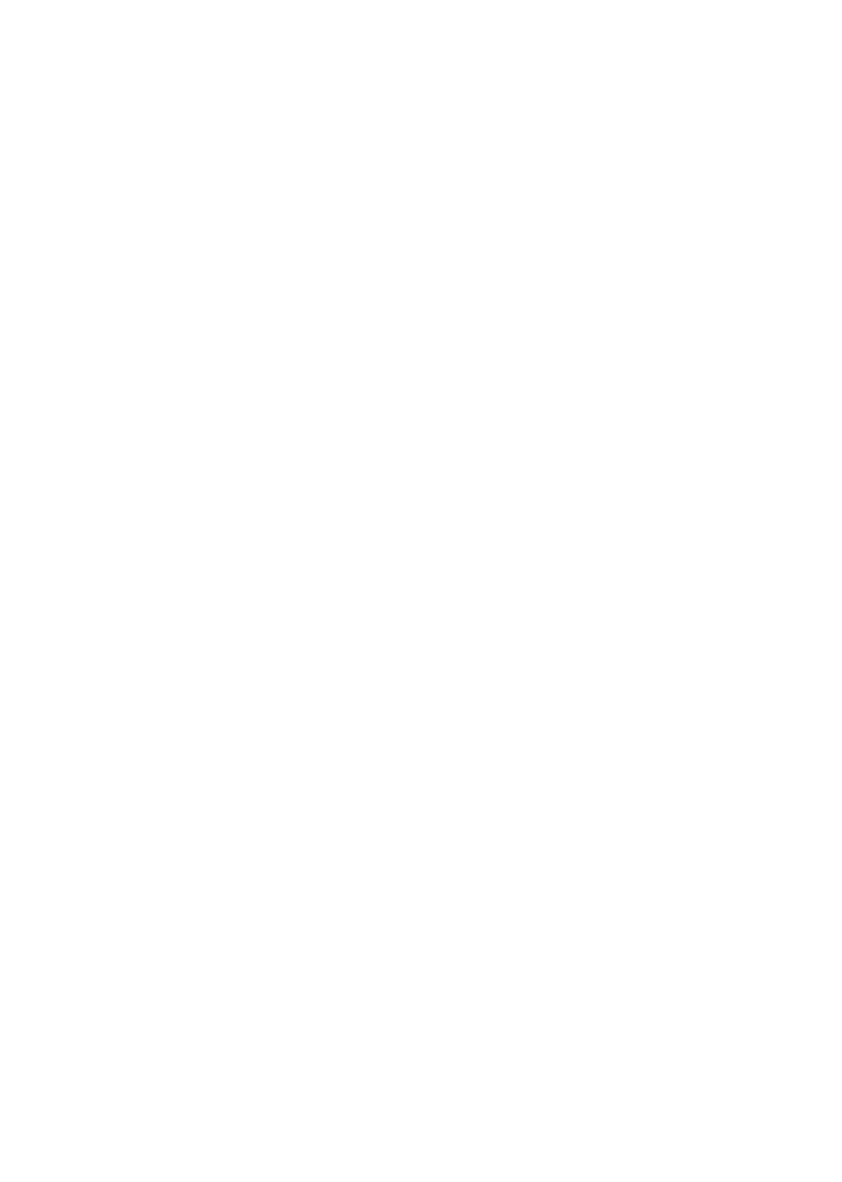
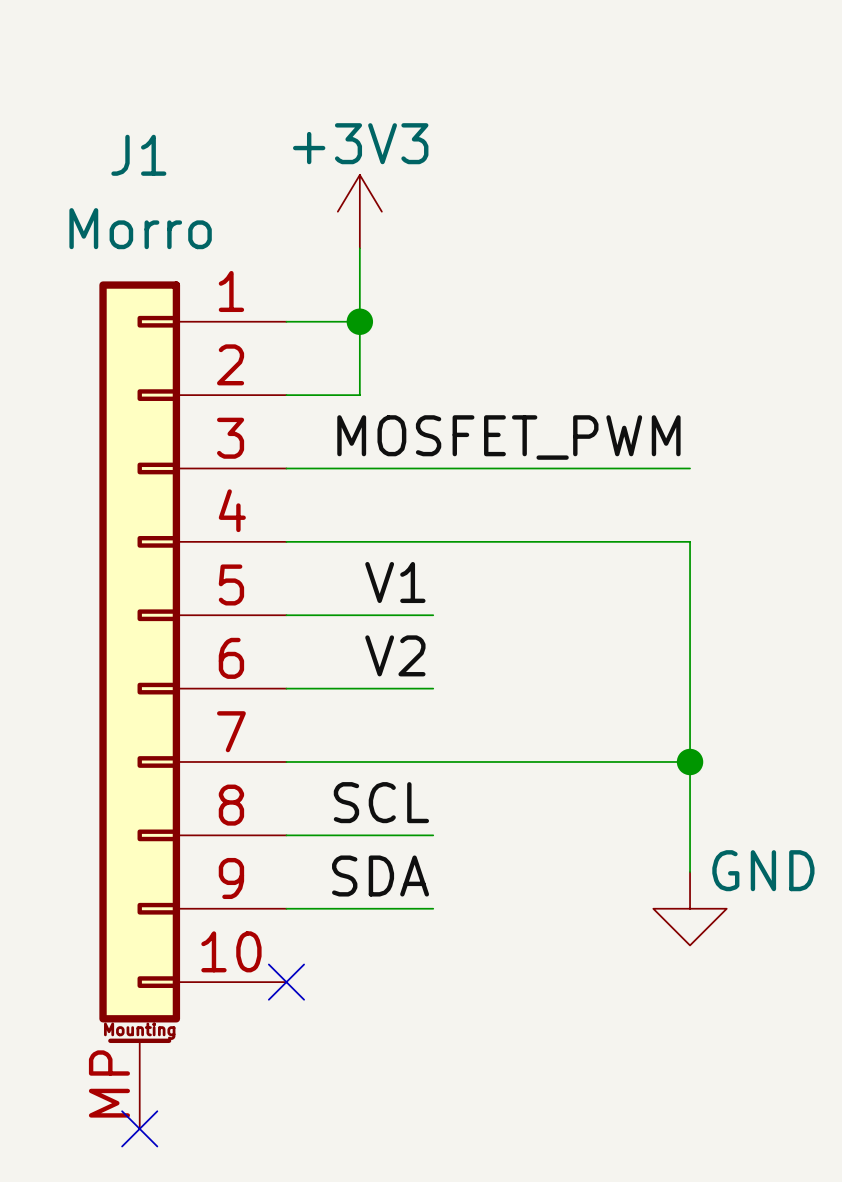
power symbol: none -> +3V3 (359, 211)
wire: none -> (359, 248) (359, 395) (286, 395)
wire: none -> (286, 321) (359, 321)
junction: none -> (359, 321)
label: none -> MOSFET_PWM (508, 437)
wire: none -> (286, 468) (690, 468)
wire: none -> (286, 541) (690, 541) (690, 872)
label: none -> V1 (395, 582)
wire: none -> (286, 615) (433, 615)
label: none -> V2 (395, 655)
wire: none -> (286, 688) (433, 688)
J1: none -> Morro (192, 705)
wire: none -> (286, 761) (690, 761)
junction: none -> (690, 761)
label: none -> SCL (381, 802)
wire: none -> (286, 835) (433, 835)
label: none -> SDA (380, 876)
wire: none -> (286, 908) (433, 908)
power symbol: none -> GND (690, 908)
no-connect mark: none -> (286, 982)
no-connect mark: none -> (139, 1128)

